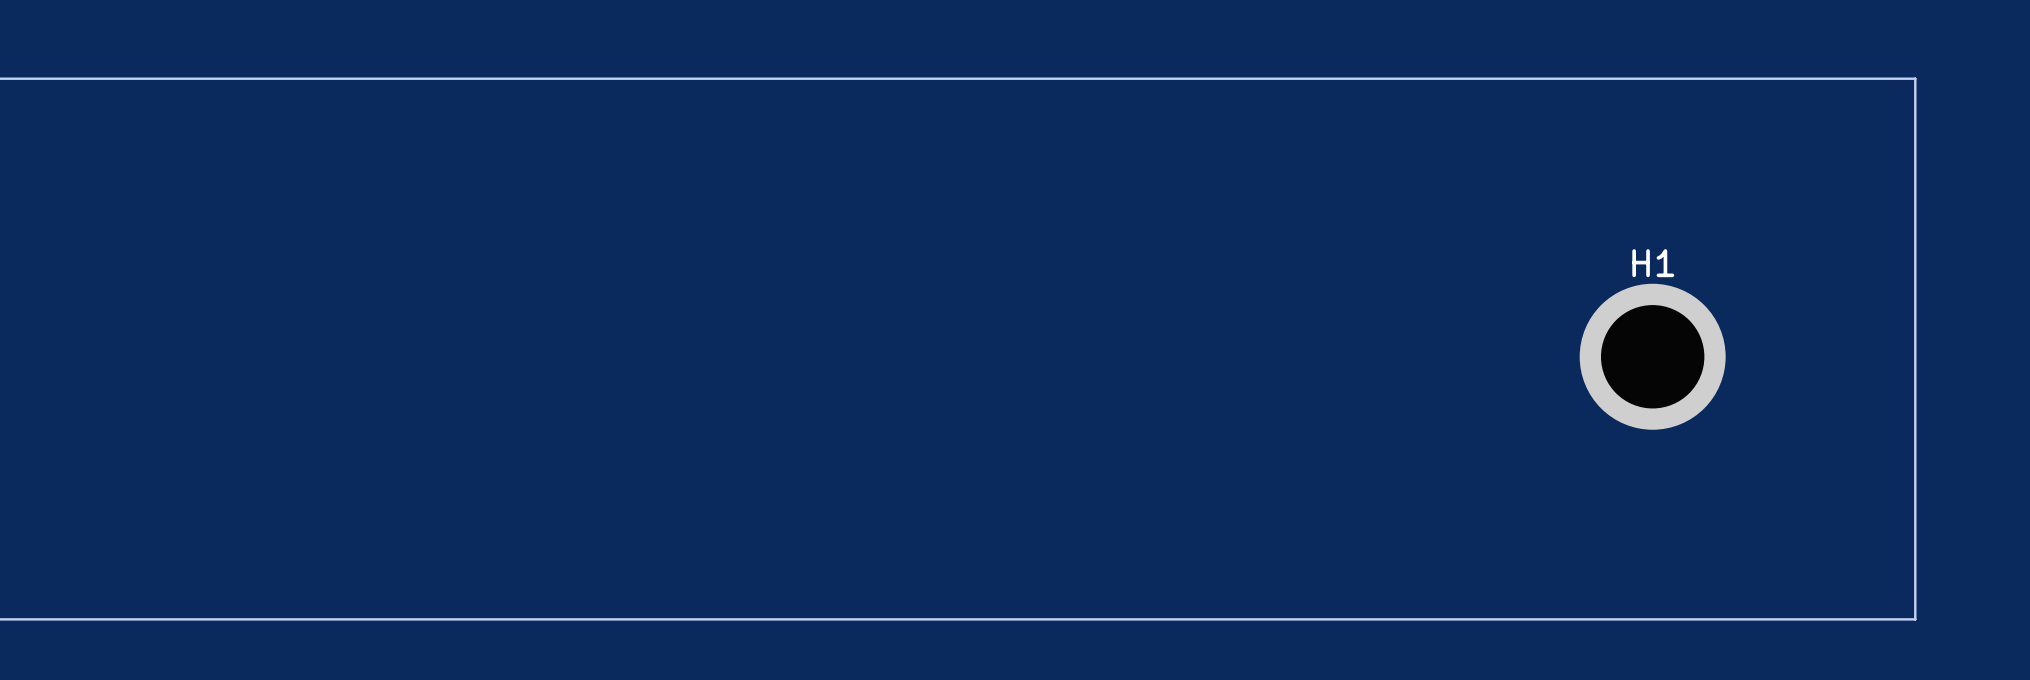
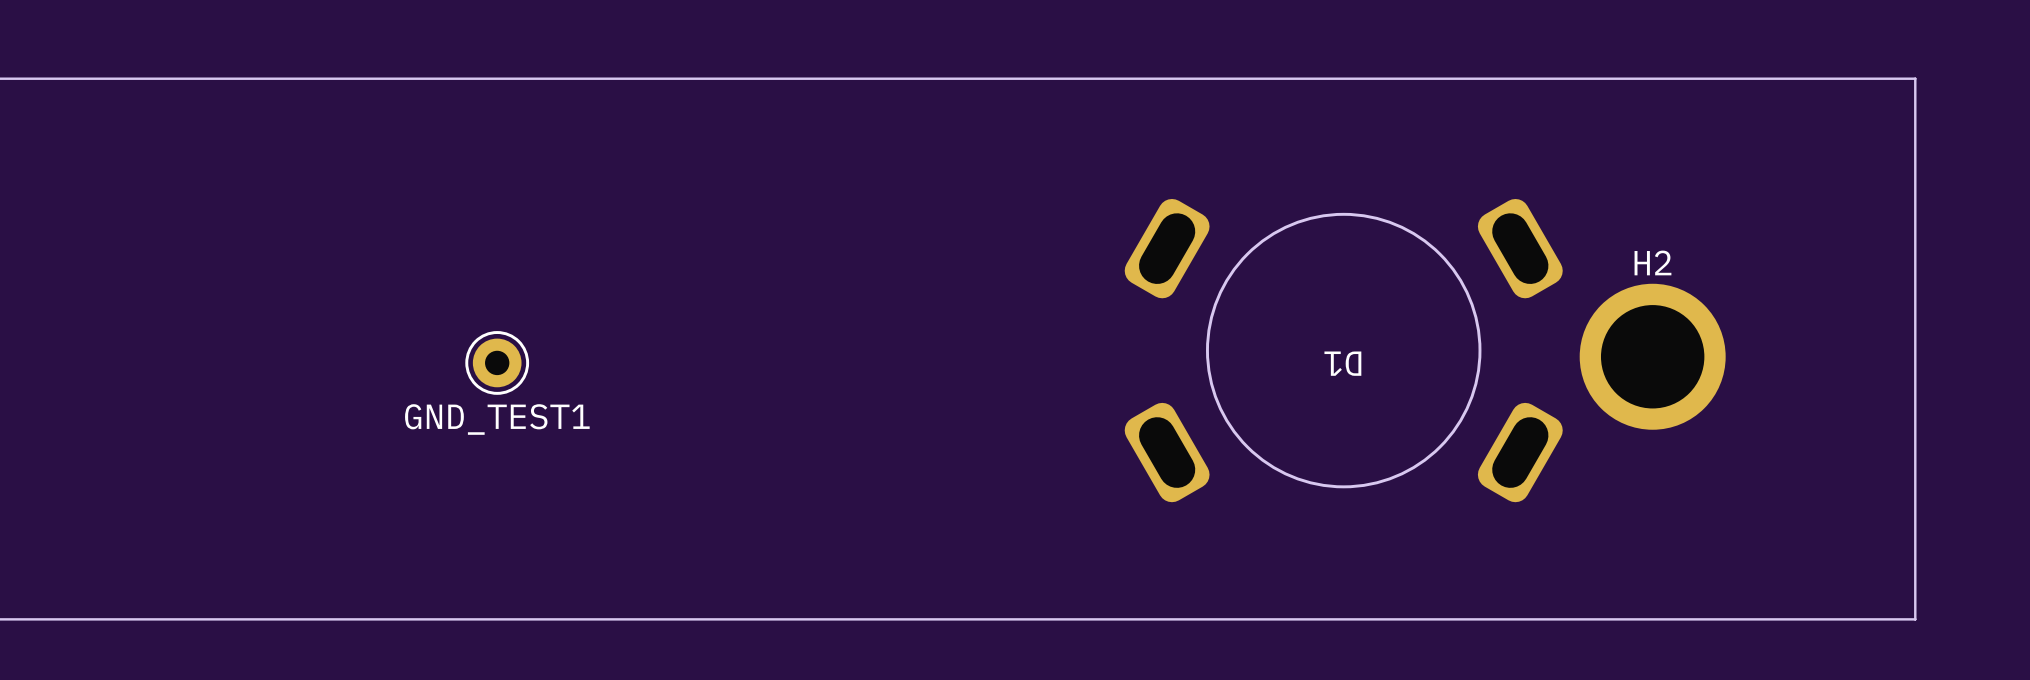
H1 name: H1 (1653, 263) -> H2 (1652, 262)
D1: none -> (1343, 350)
GND_TEST1: none -> (497, 362)

